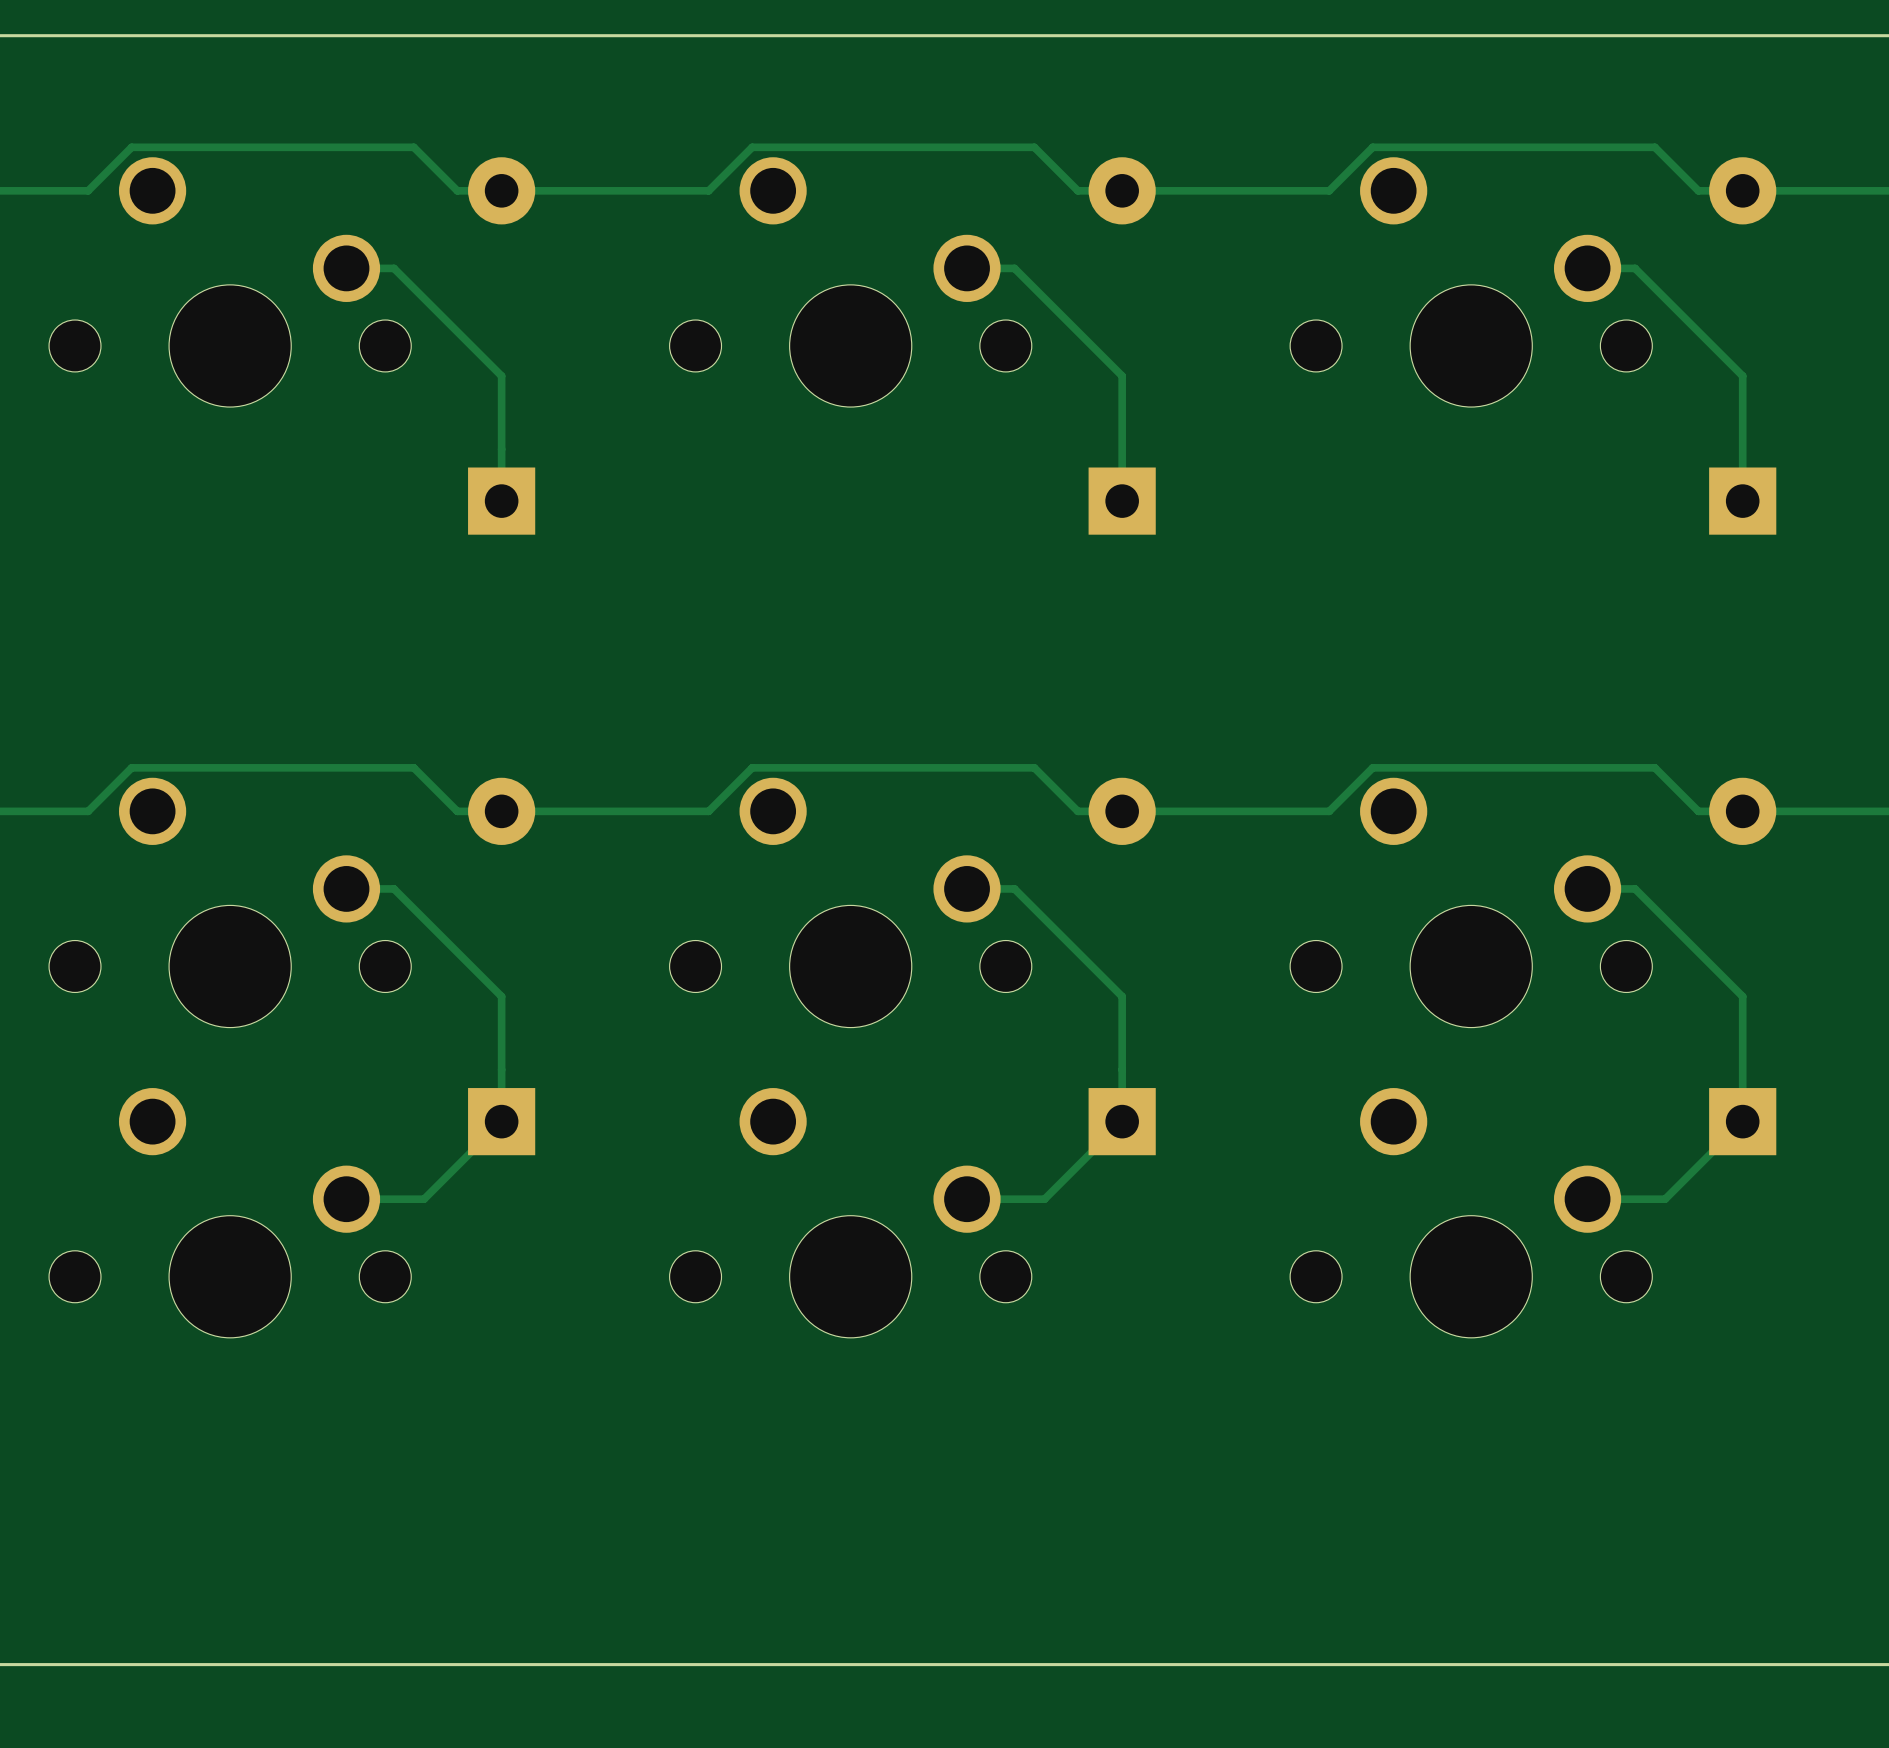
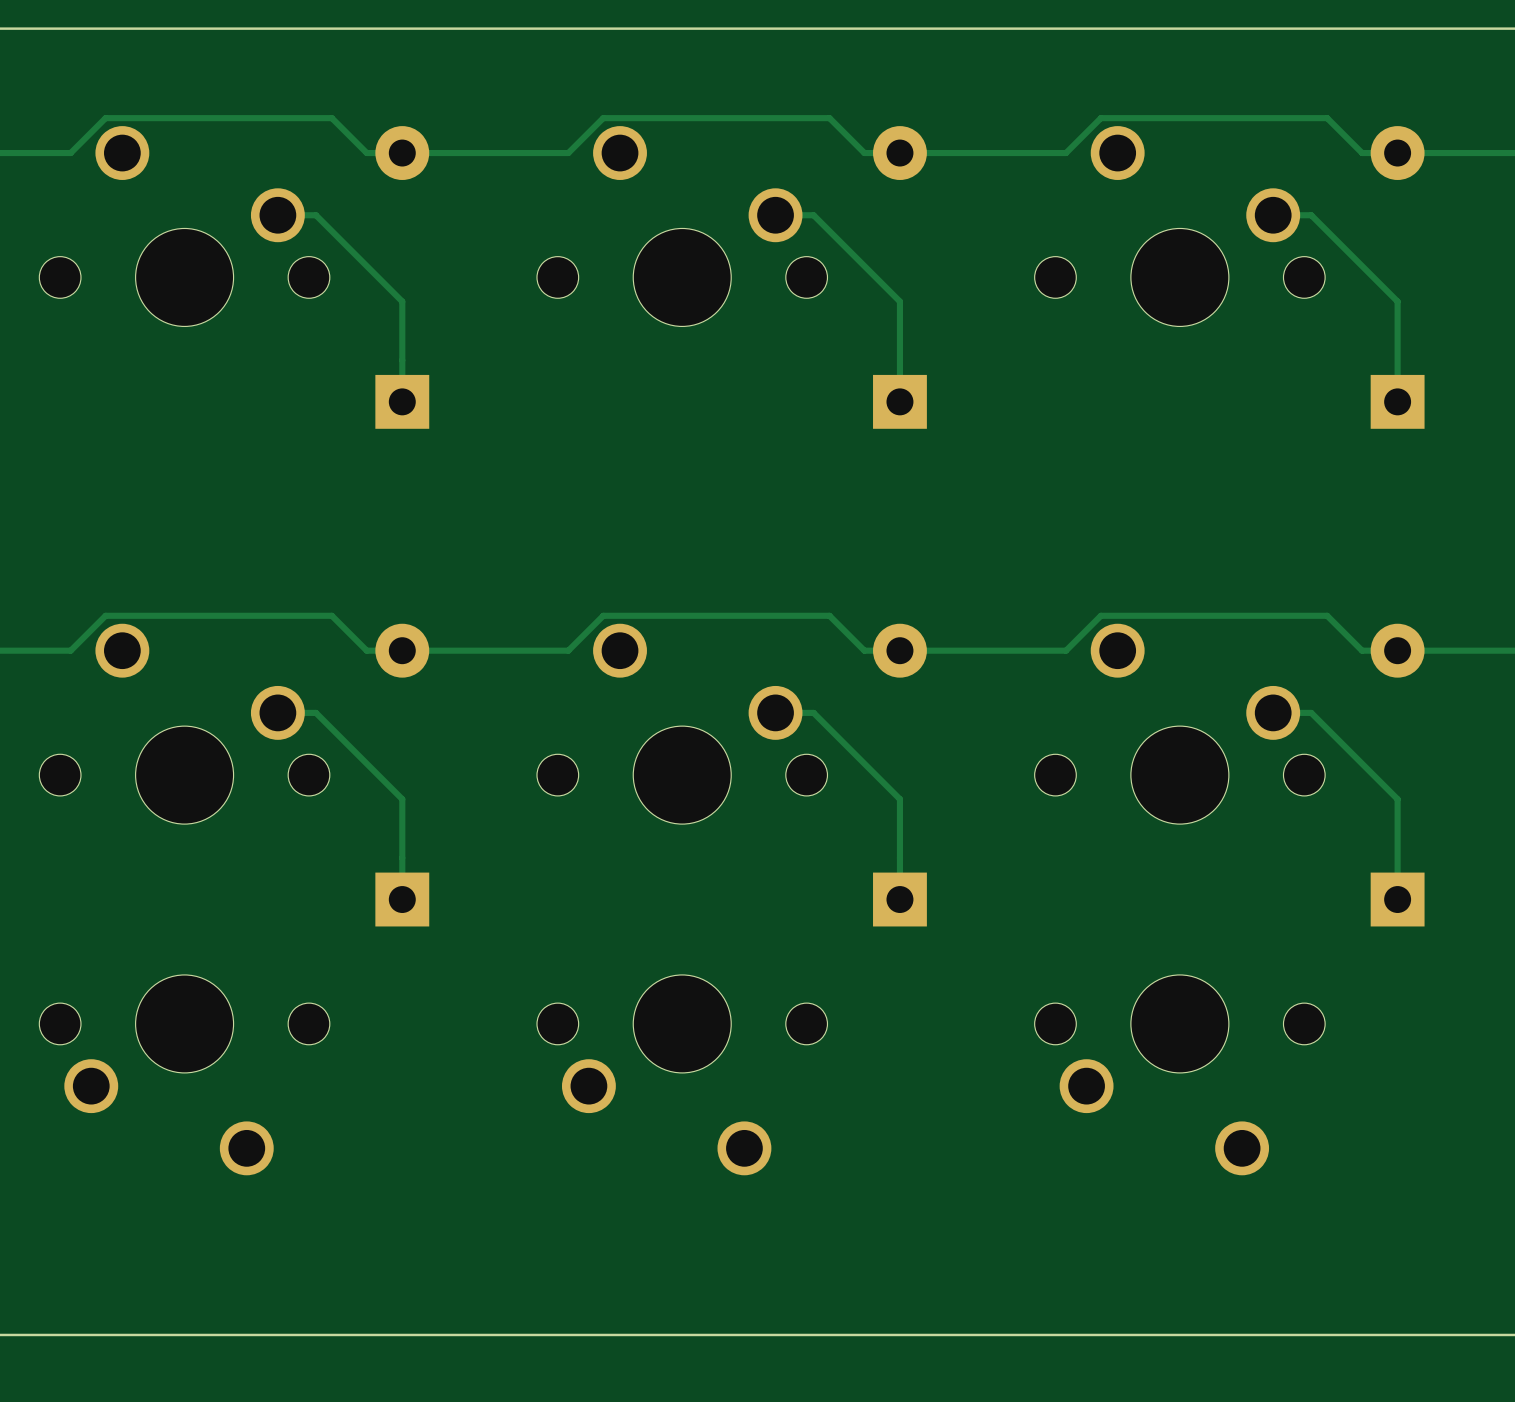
track: (501, 1121) (424, 1199) (346, 1199) -> none
track: (1122, 1121) (1044, 1199) (967, 1199) -> none
track: (1742, 1121) (1665, 1199) (1587, 1199) -> none
part rotation: 0° (230, 1212) -> 180° (184, 1075)
part rotation: 0° (850, 1212) -> 180° (682, 1075)
part rotation: 0° (1471, 1212) -> 180° (1179, 1075)

